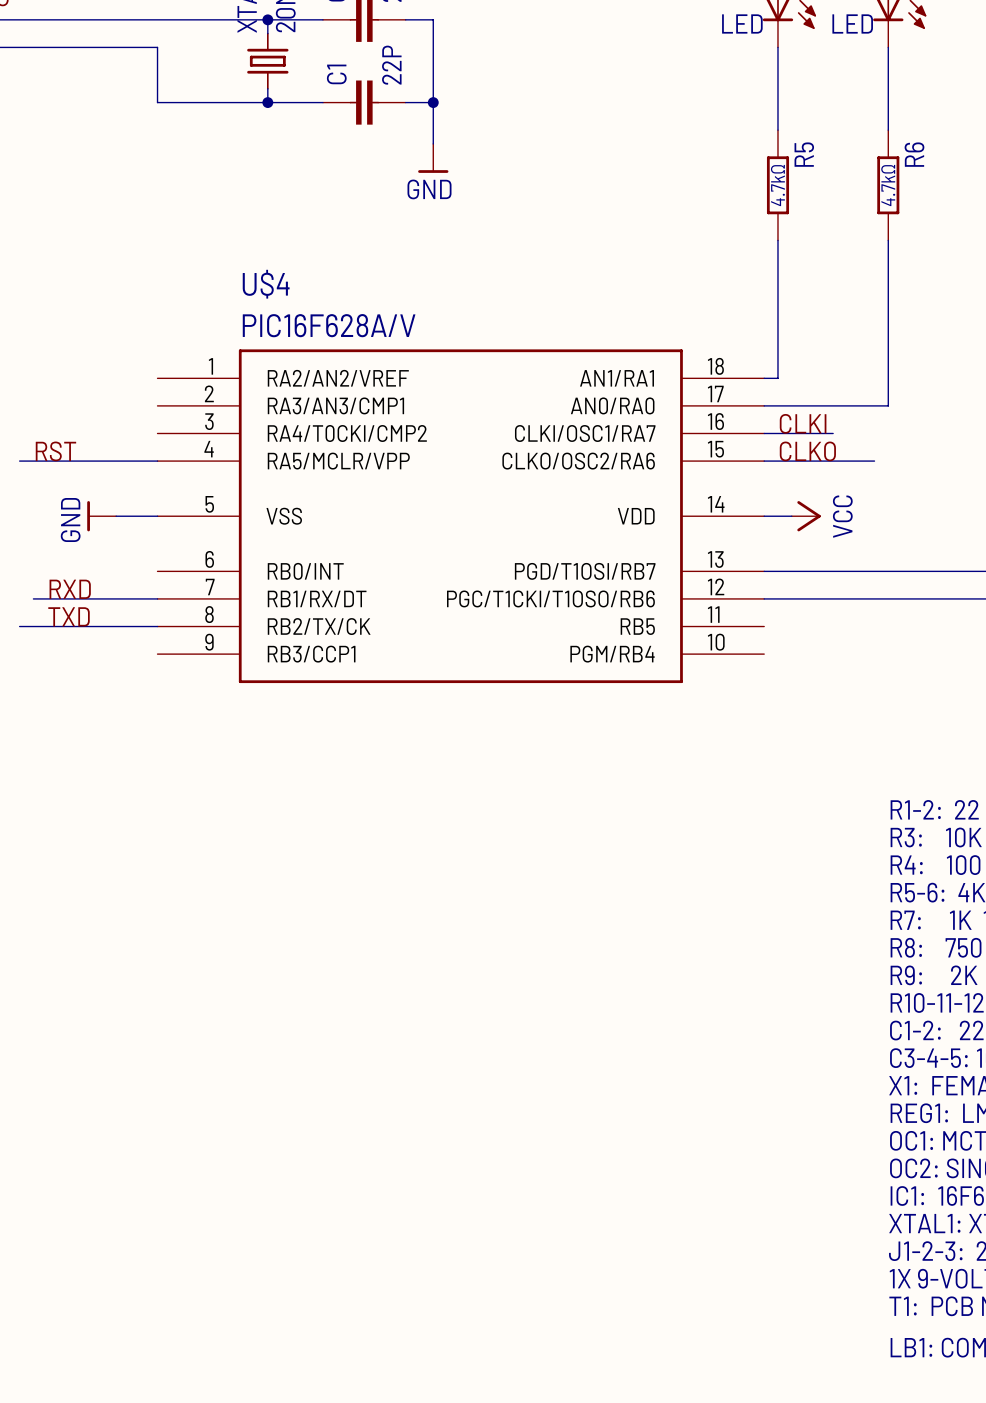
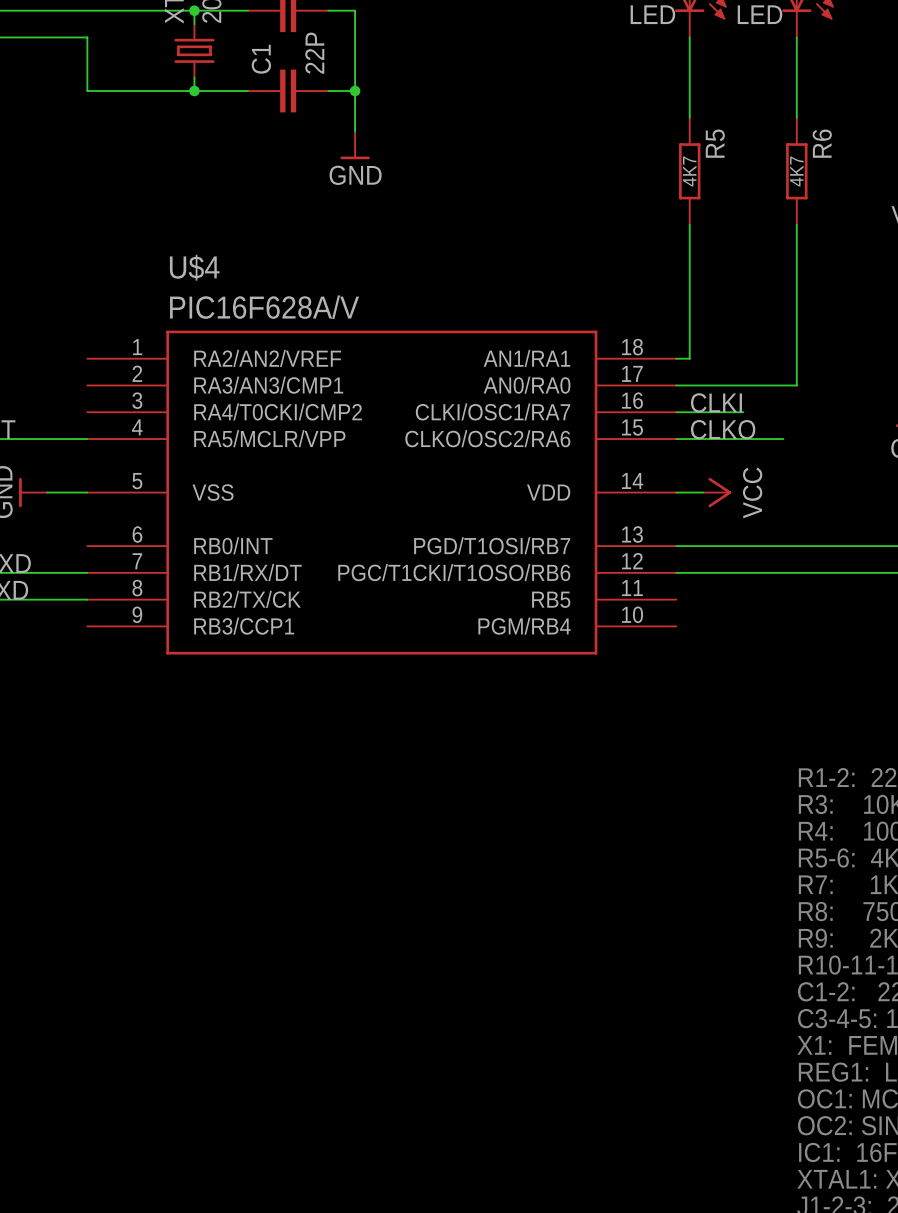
R5 value: 4.7kΩ (777, 185) -> 4K7 (689, 171)
R6 value: 4.7kΩ (888, 185) -> 4K7 (796, 171)

